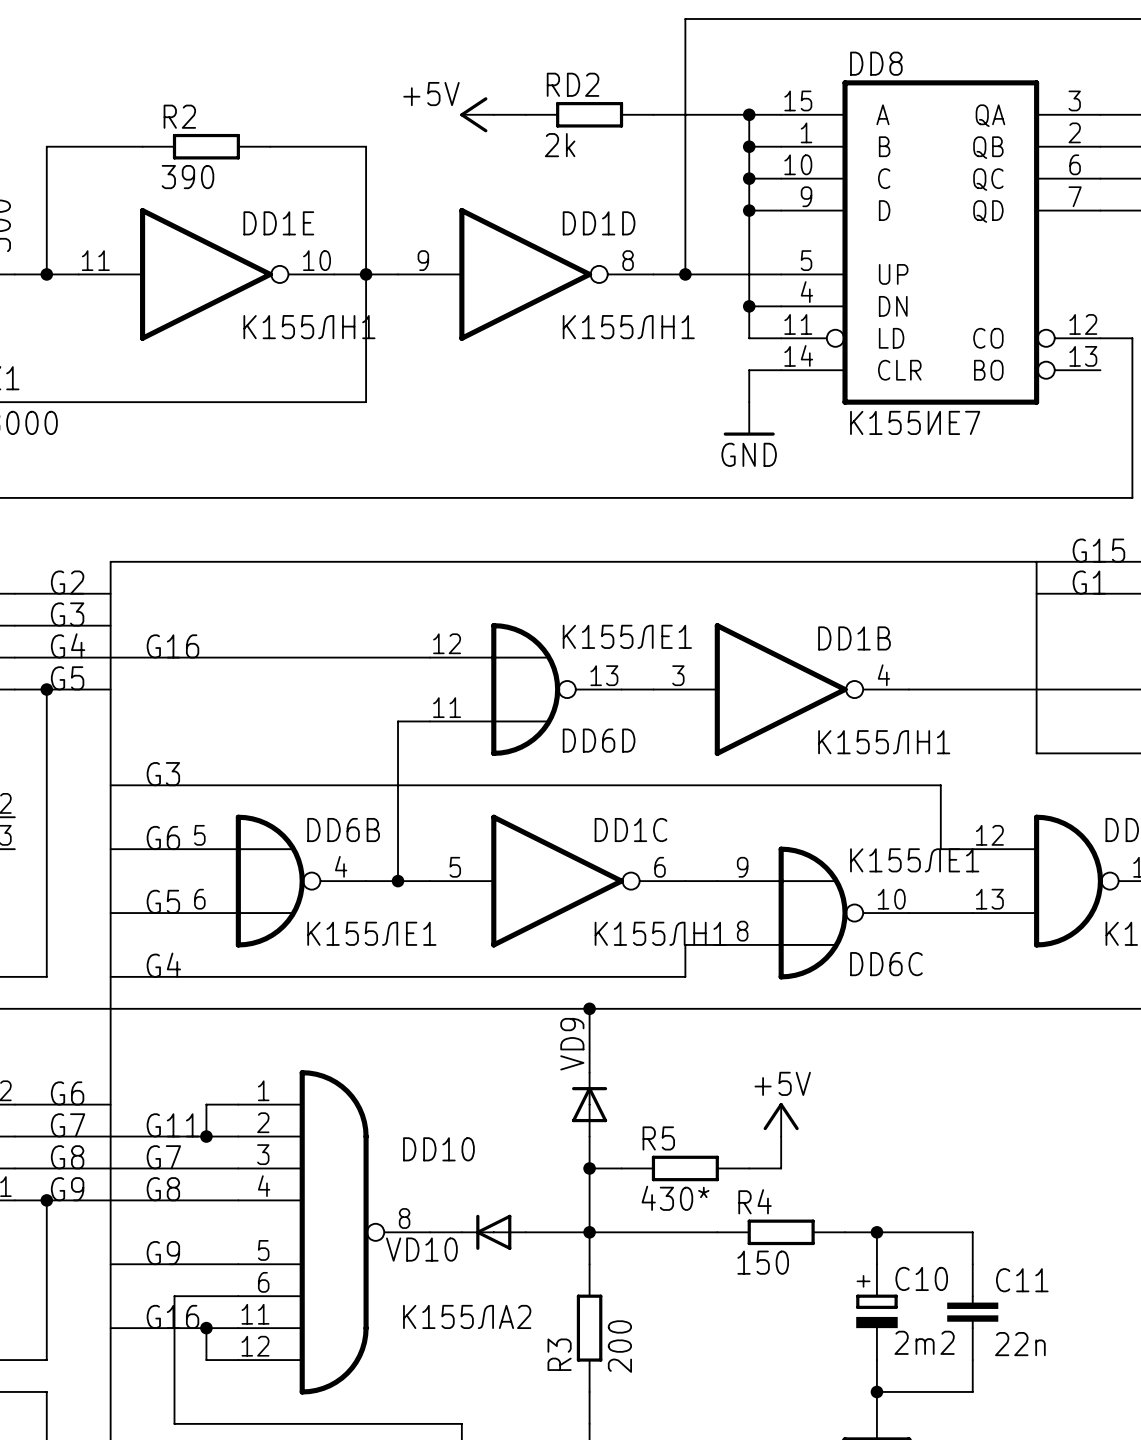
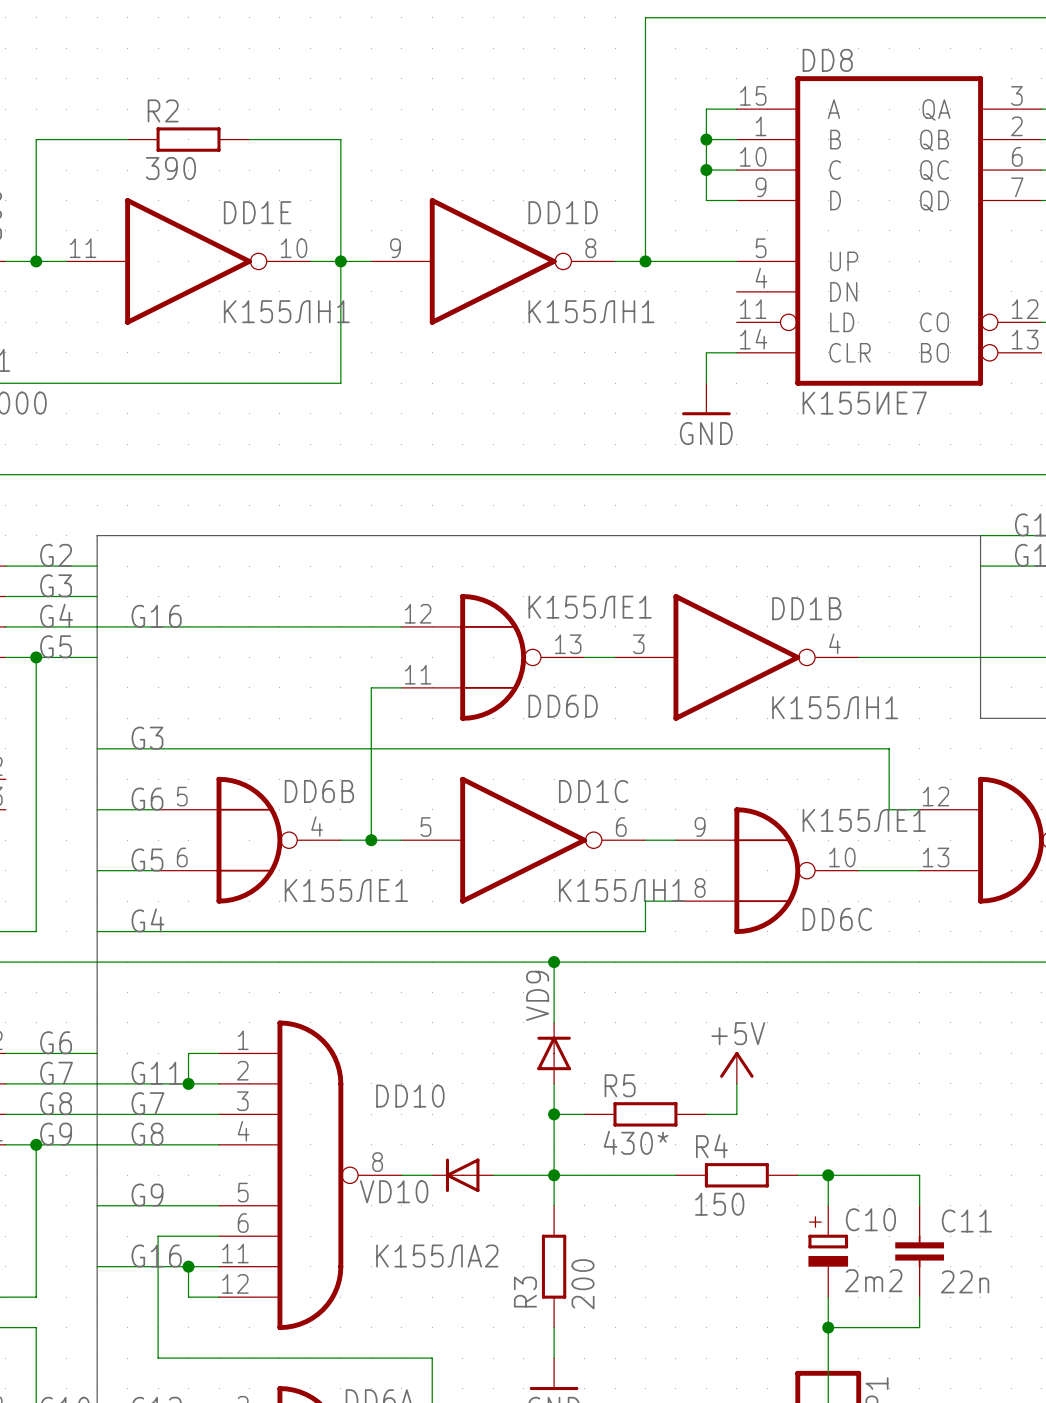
power symbol: +5V (477, 114) -> none
wire: (493, 114) (525, 114) -> none
RD2: 2k (589, 114) -> none
wire: (653, 114) (749, 114) -> none
junction: (749, 114) -> none
wire: (749, 210) (749, 338) (781, 338) -> none
junction: (749, 210) -> none
wire: (749, 306) (781, 306) -> none
junction: (749, 306) -> none

